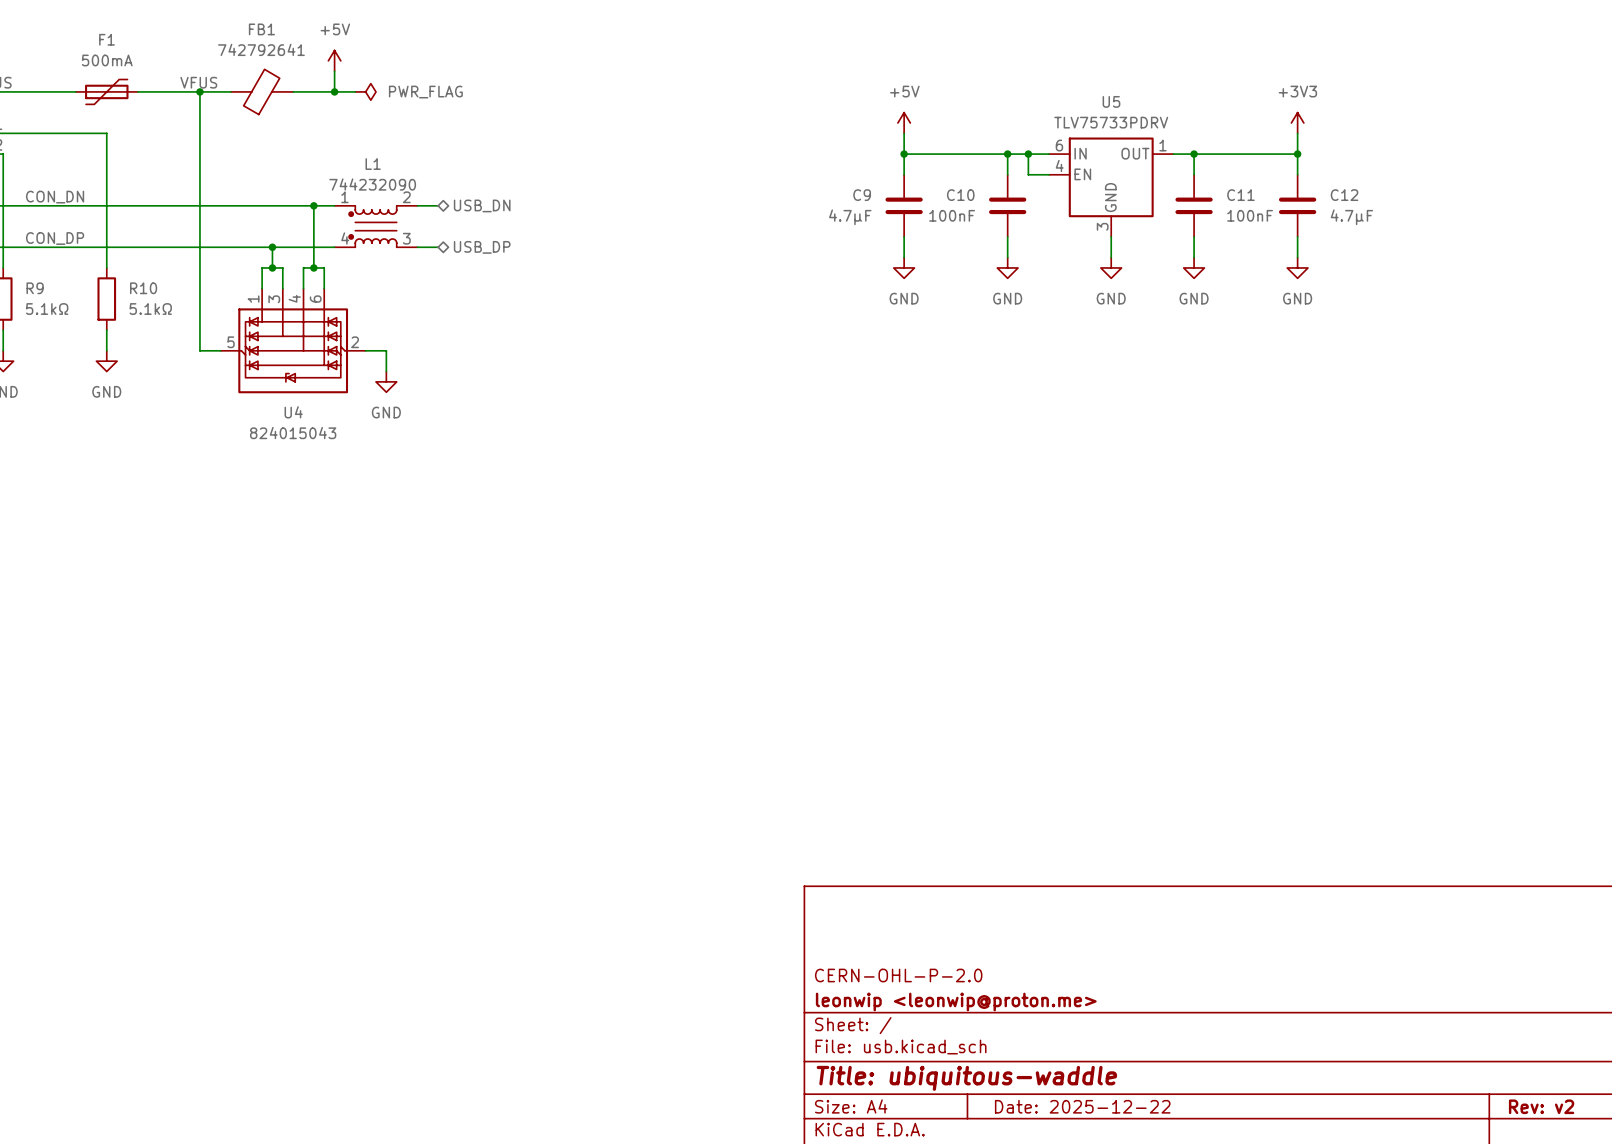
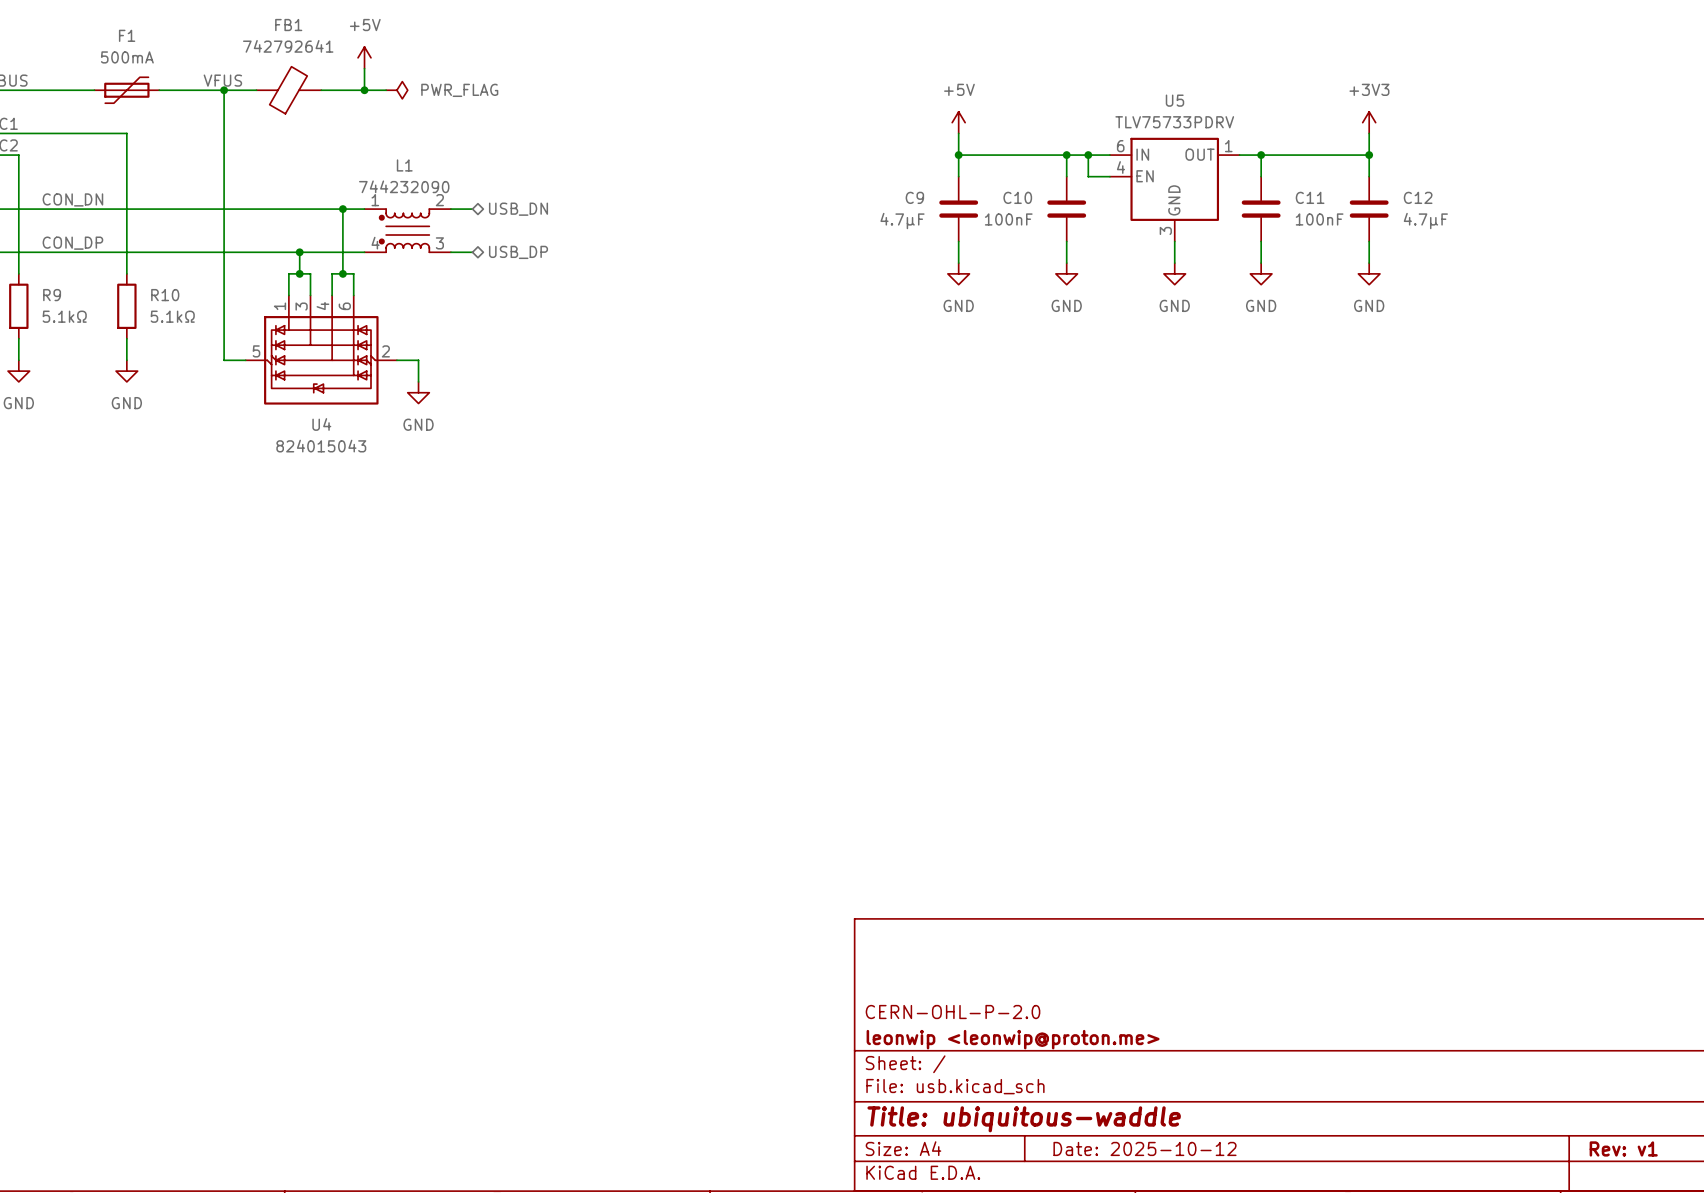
title block: Date: 2025-12-22 (1082, 1106) -> Date: 2025-10-12 (1145, 1148)
title block: Rev: v2 (1541, 1106) -> Rev: v1 (1623, 1148)

